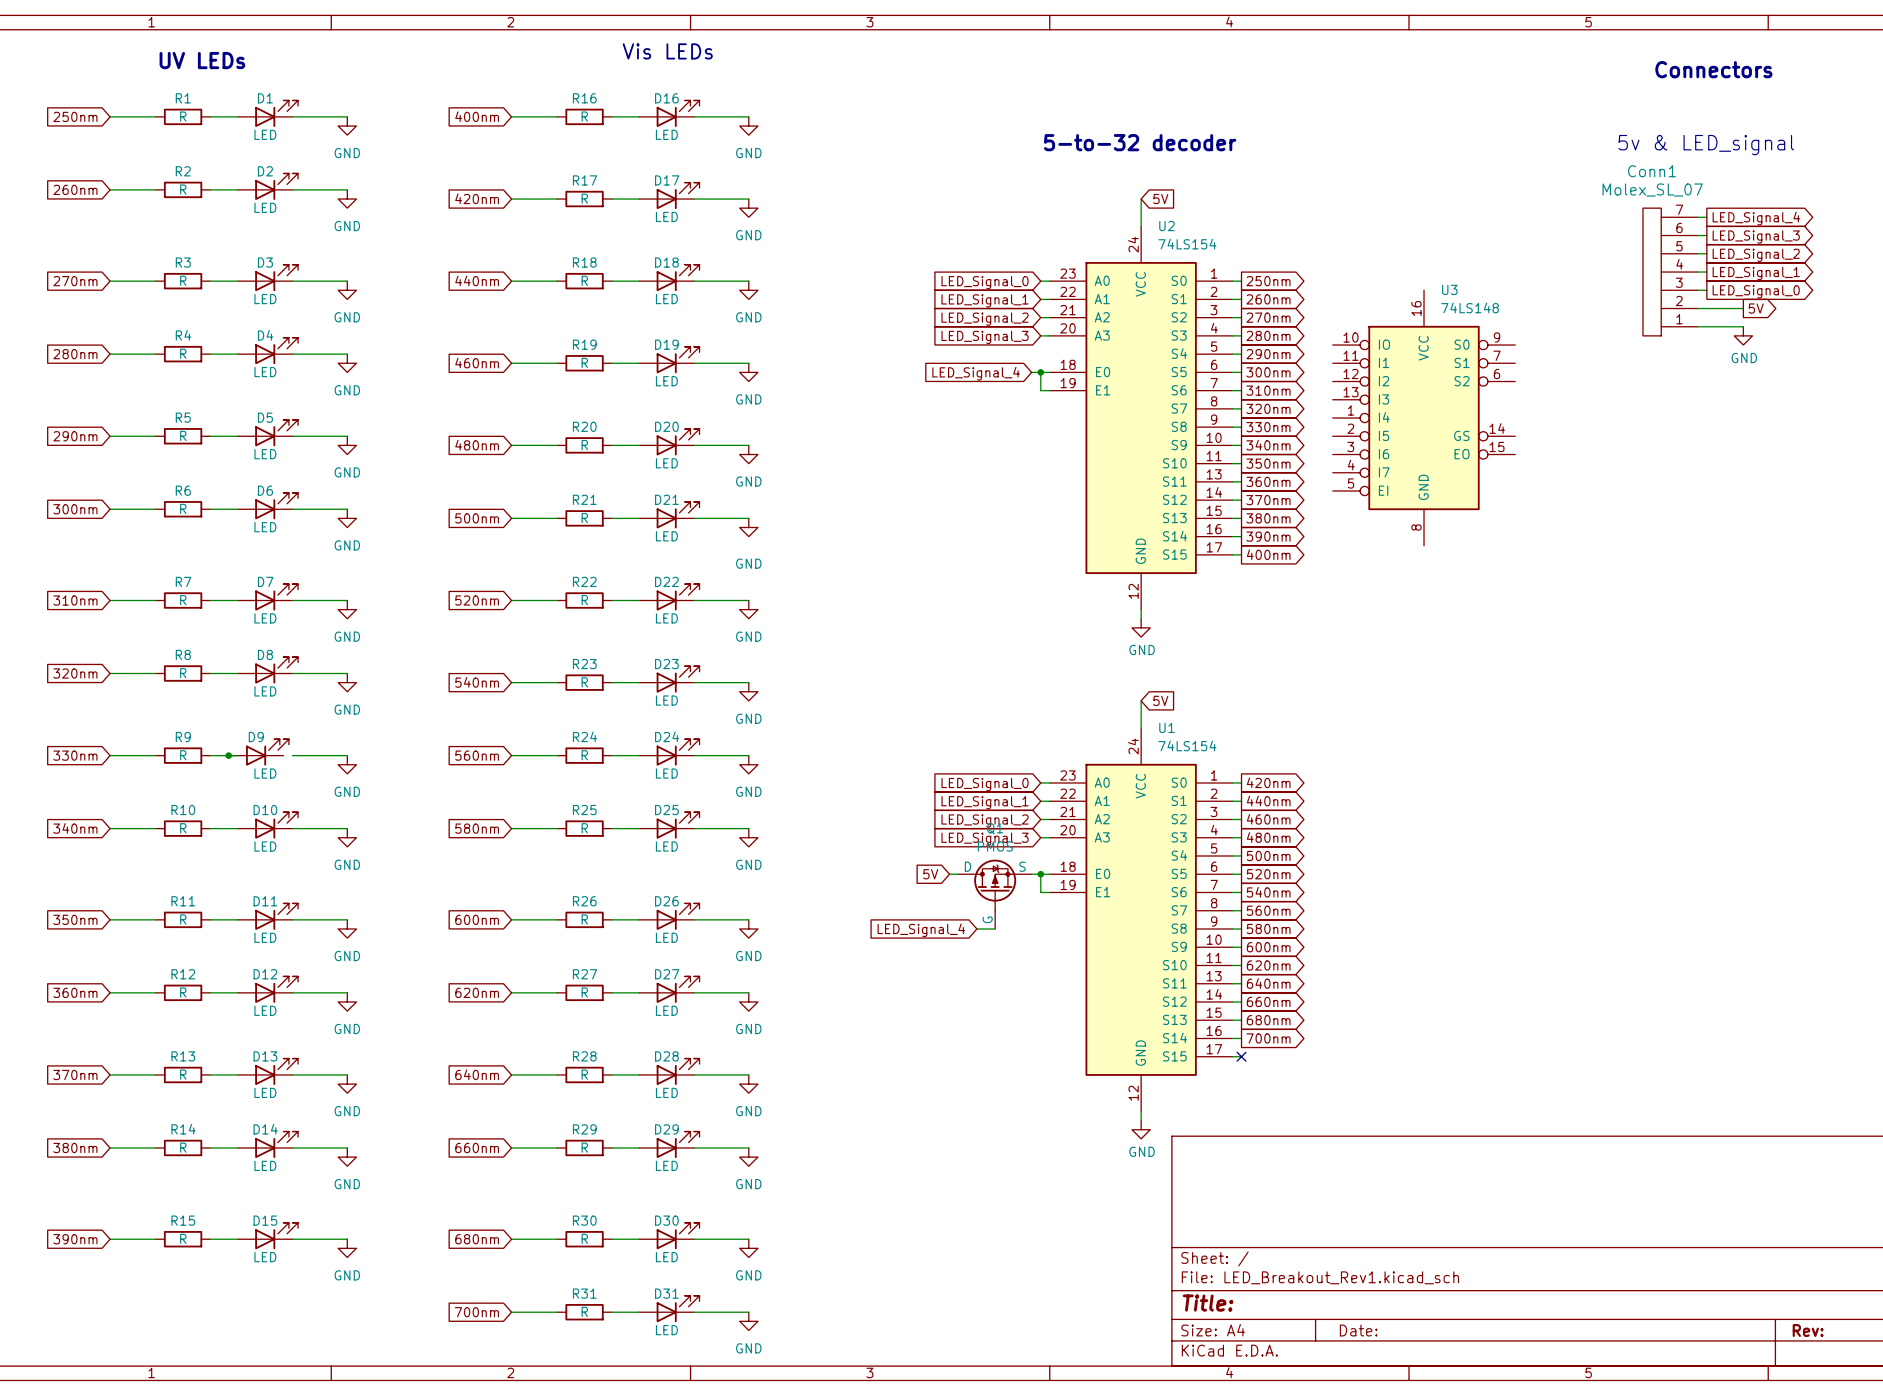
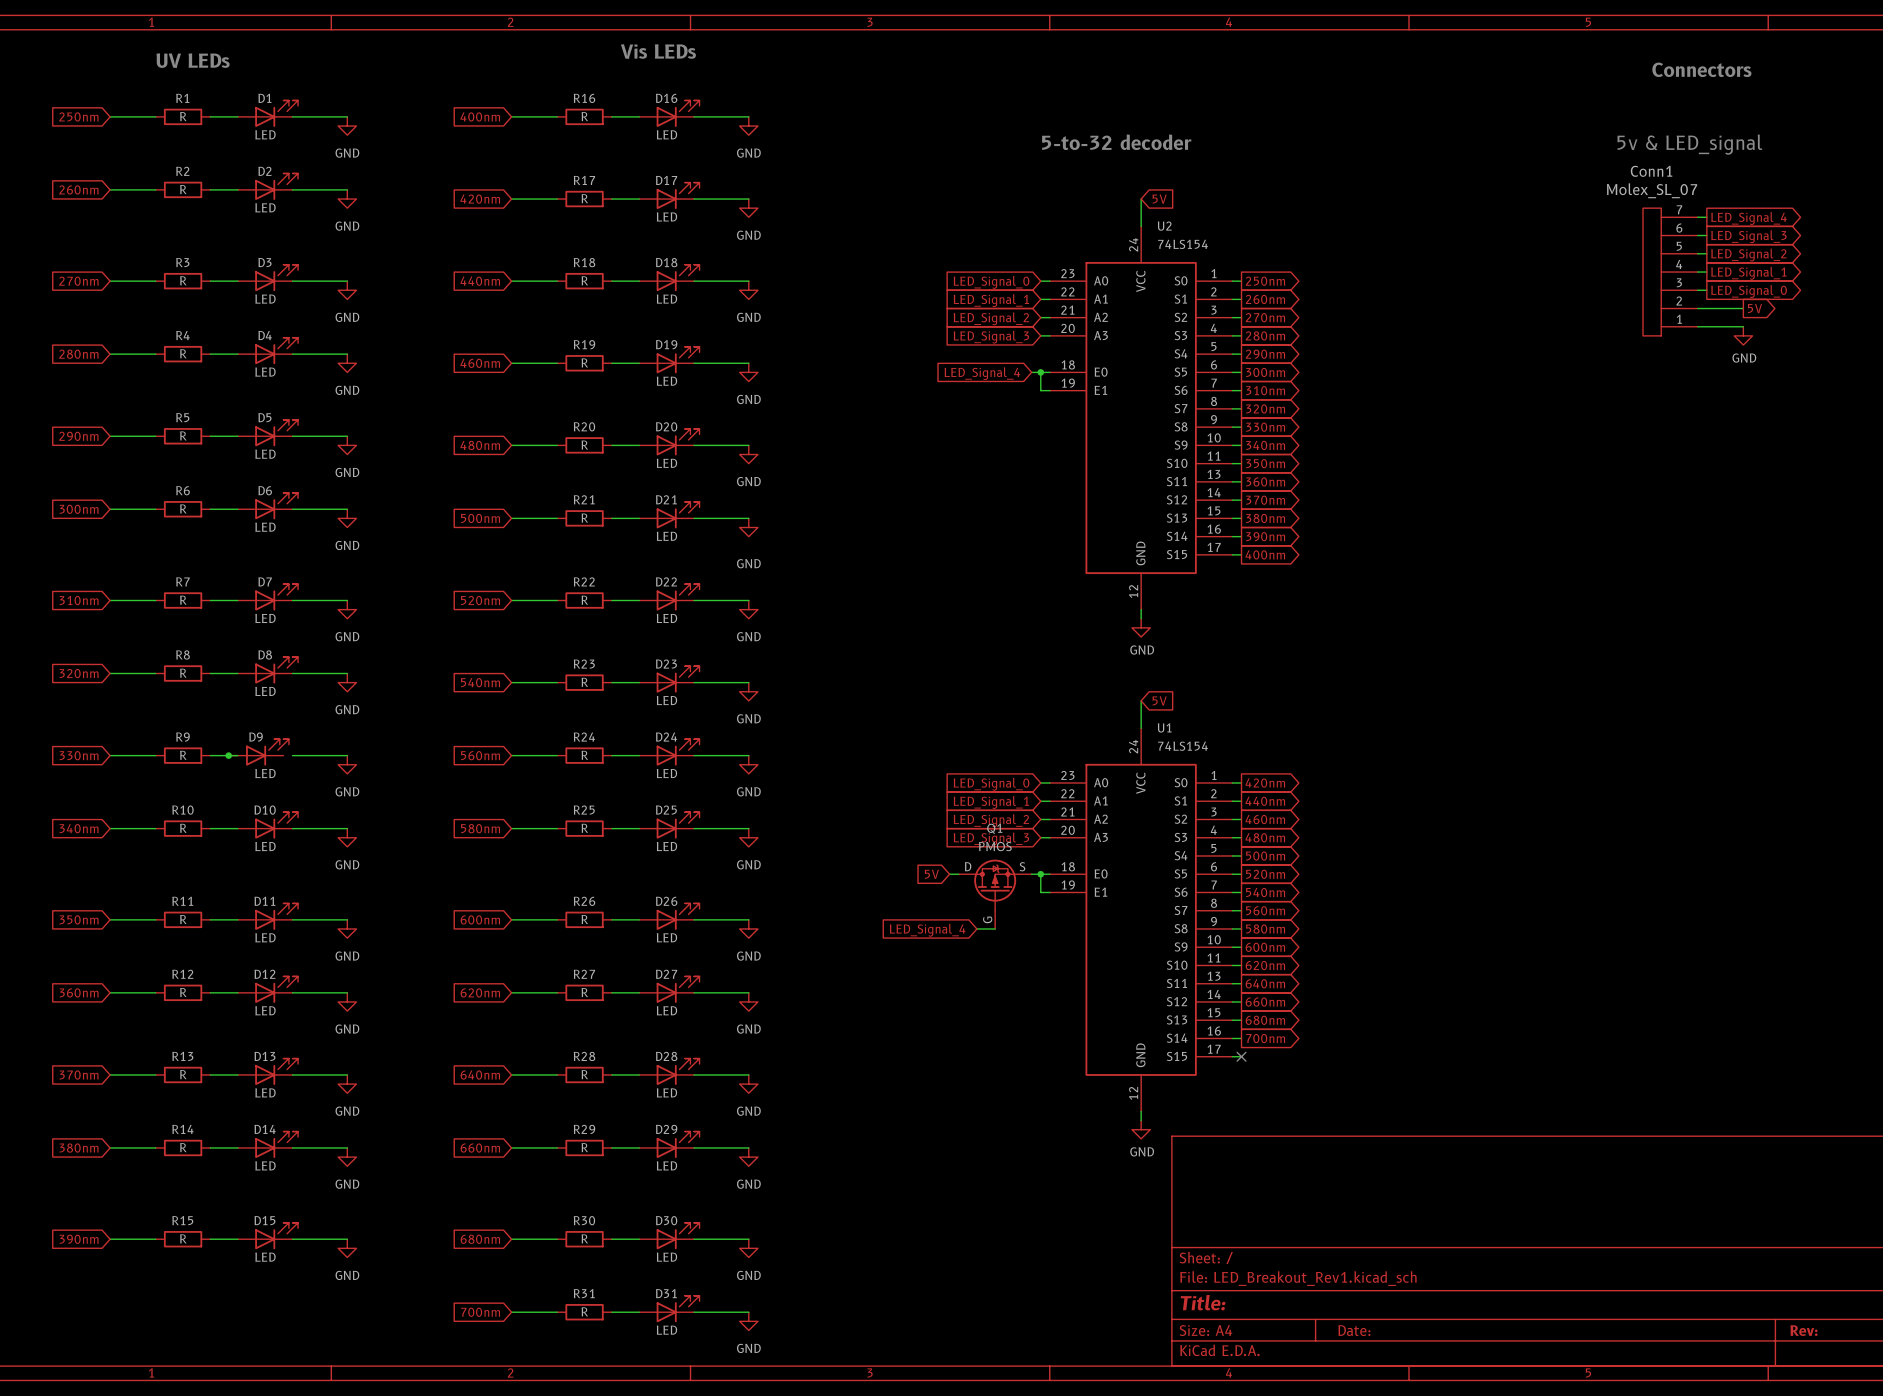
U3: 74LS148 (1424, 418) -> none

